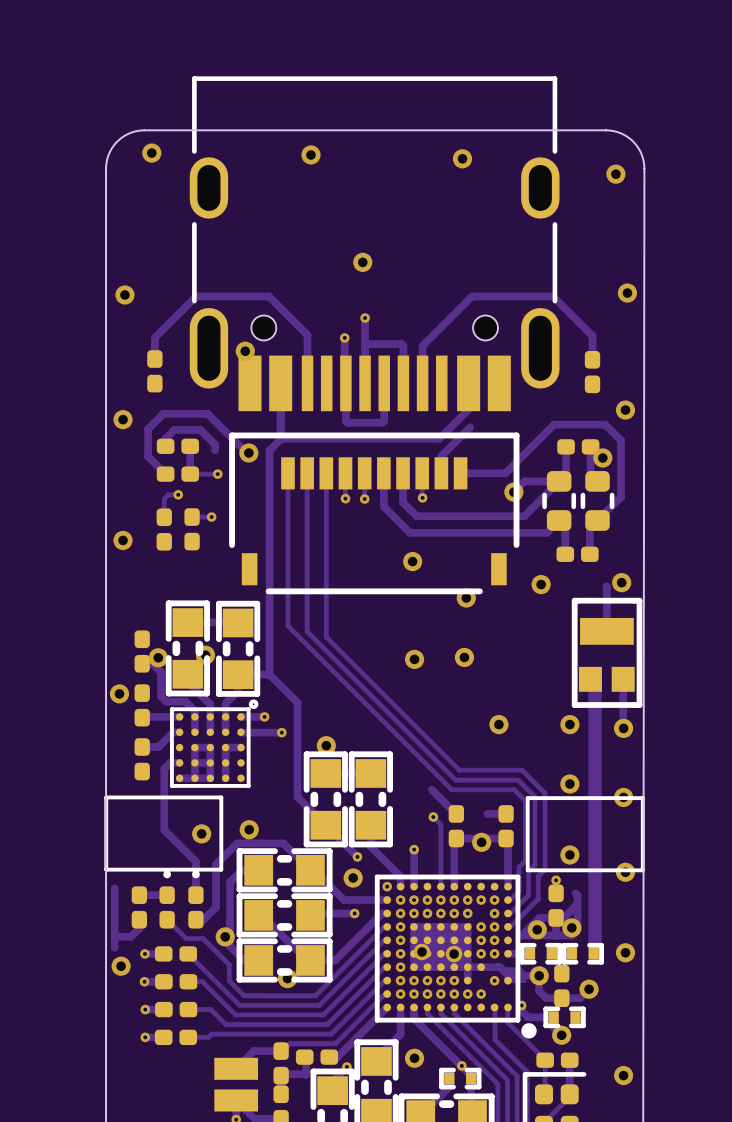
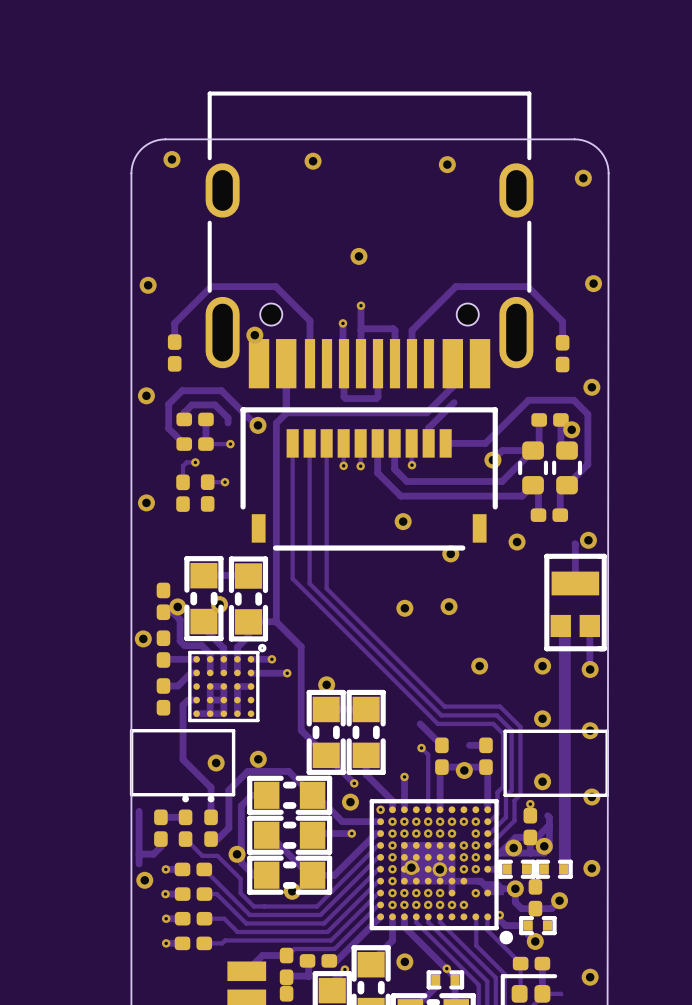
track: none -> (542, 993) (560, 993)

